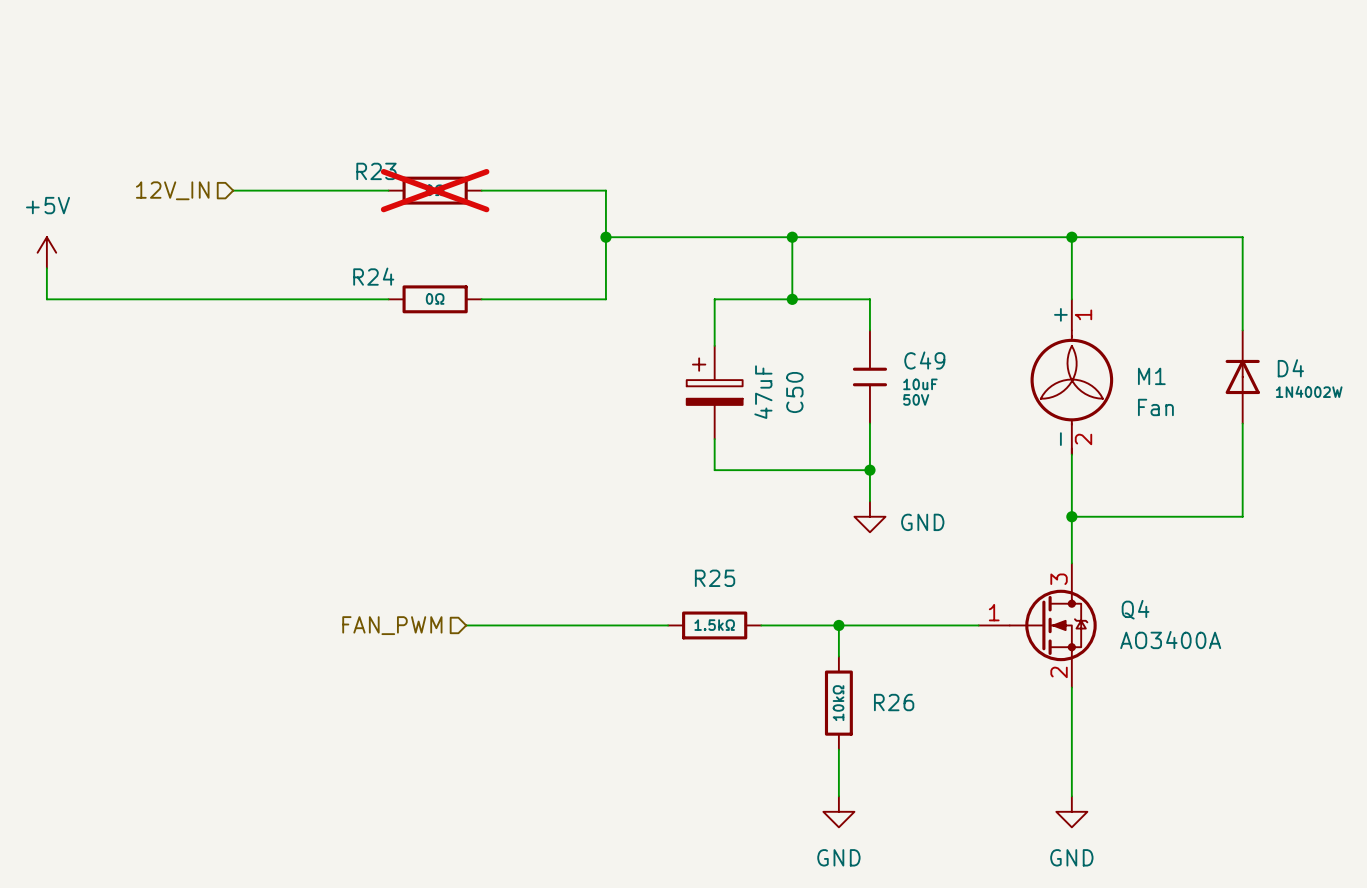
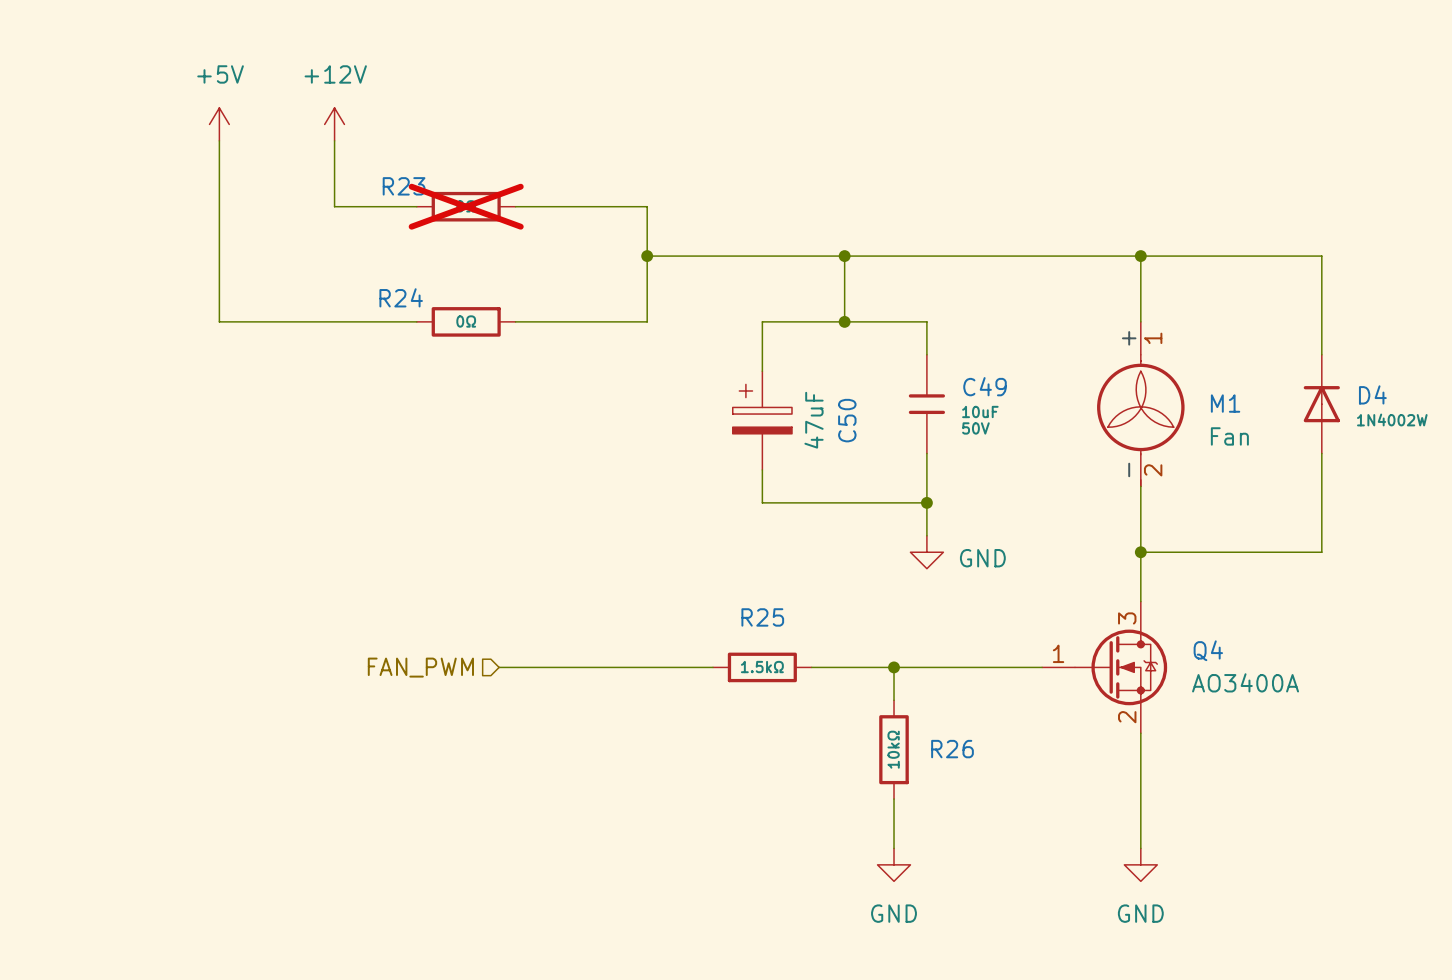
power symbol: none -> +12V (334, 124)
hierarchical label: 12V_IN (172, 190) -> none
wire: (233, 190) (310, 190) -> (334, 140) (334, 206)
power symbol position: +5V (46, 252) -> +5V (219, 124)
wire: (46, 268) (46, 299) (202, 299) -> (219, 140) (219, 321)

